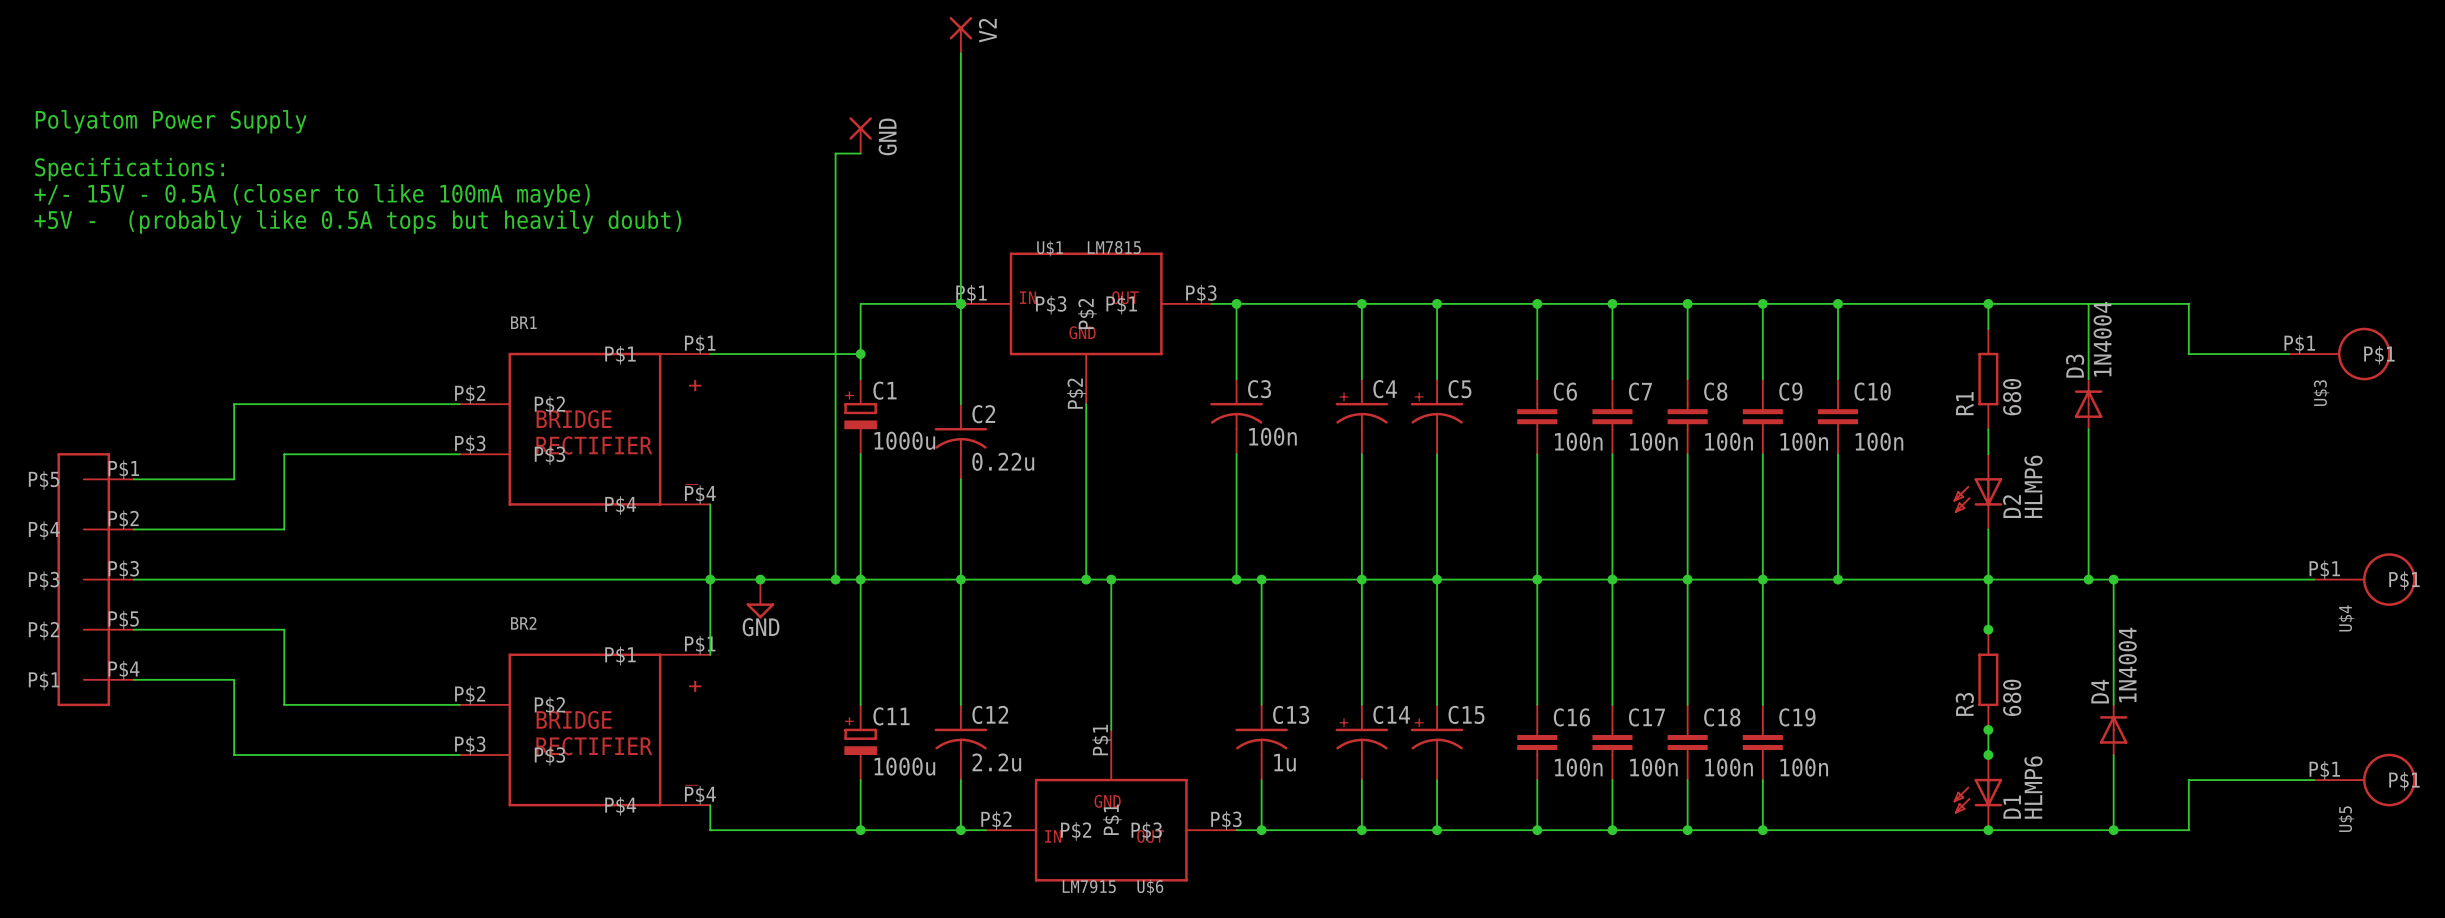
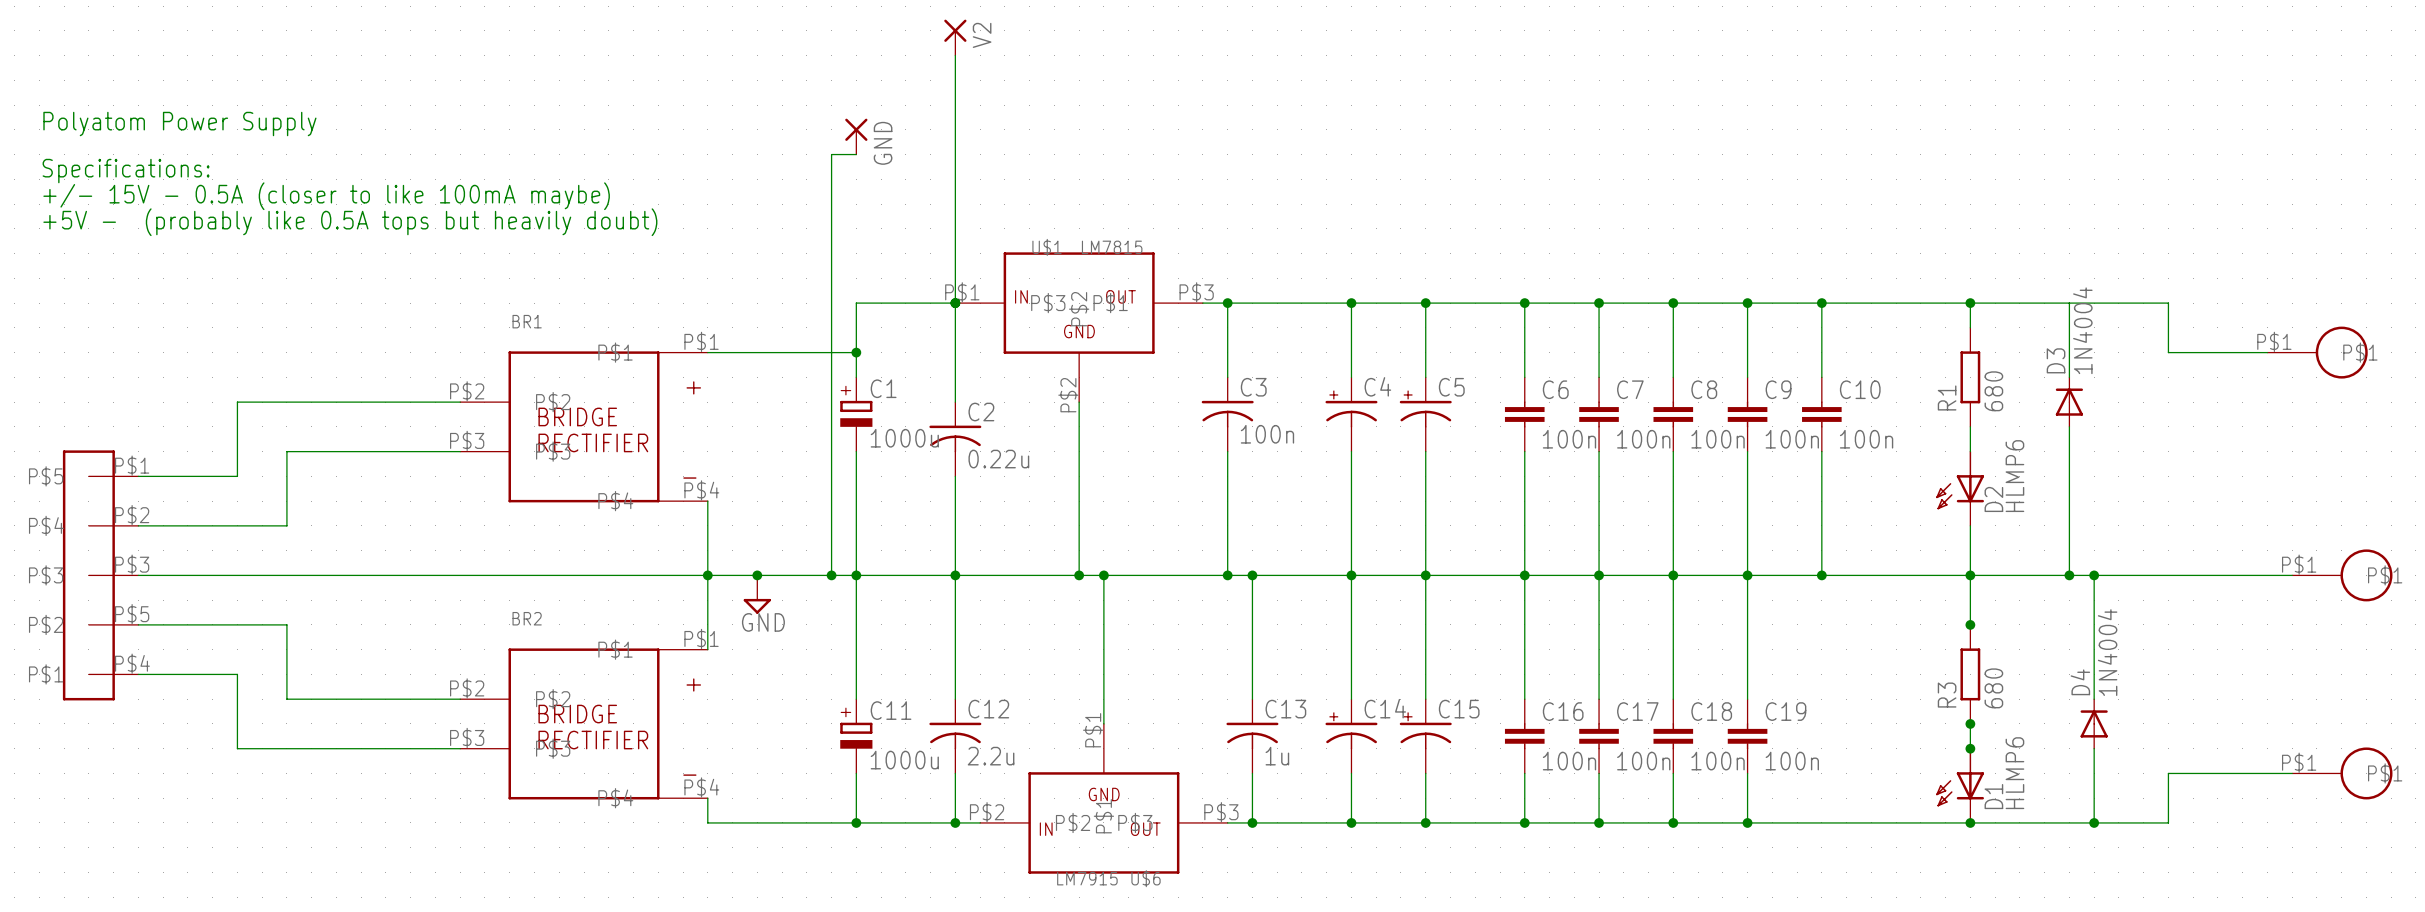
U$3 name: U$3 (2321, 393) -> none
U$4 name: U$4 (2346, 618) -> none
U$5 name: U$5 (2346, 819) -> none

